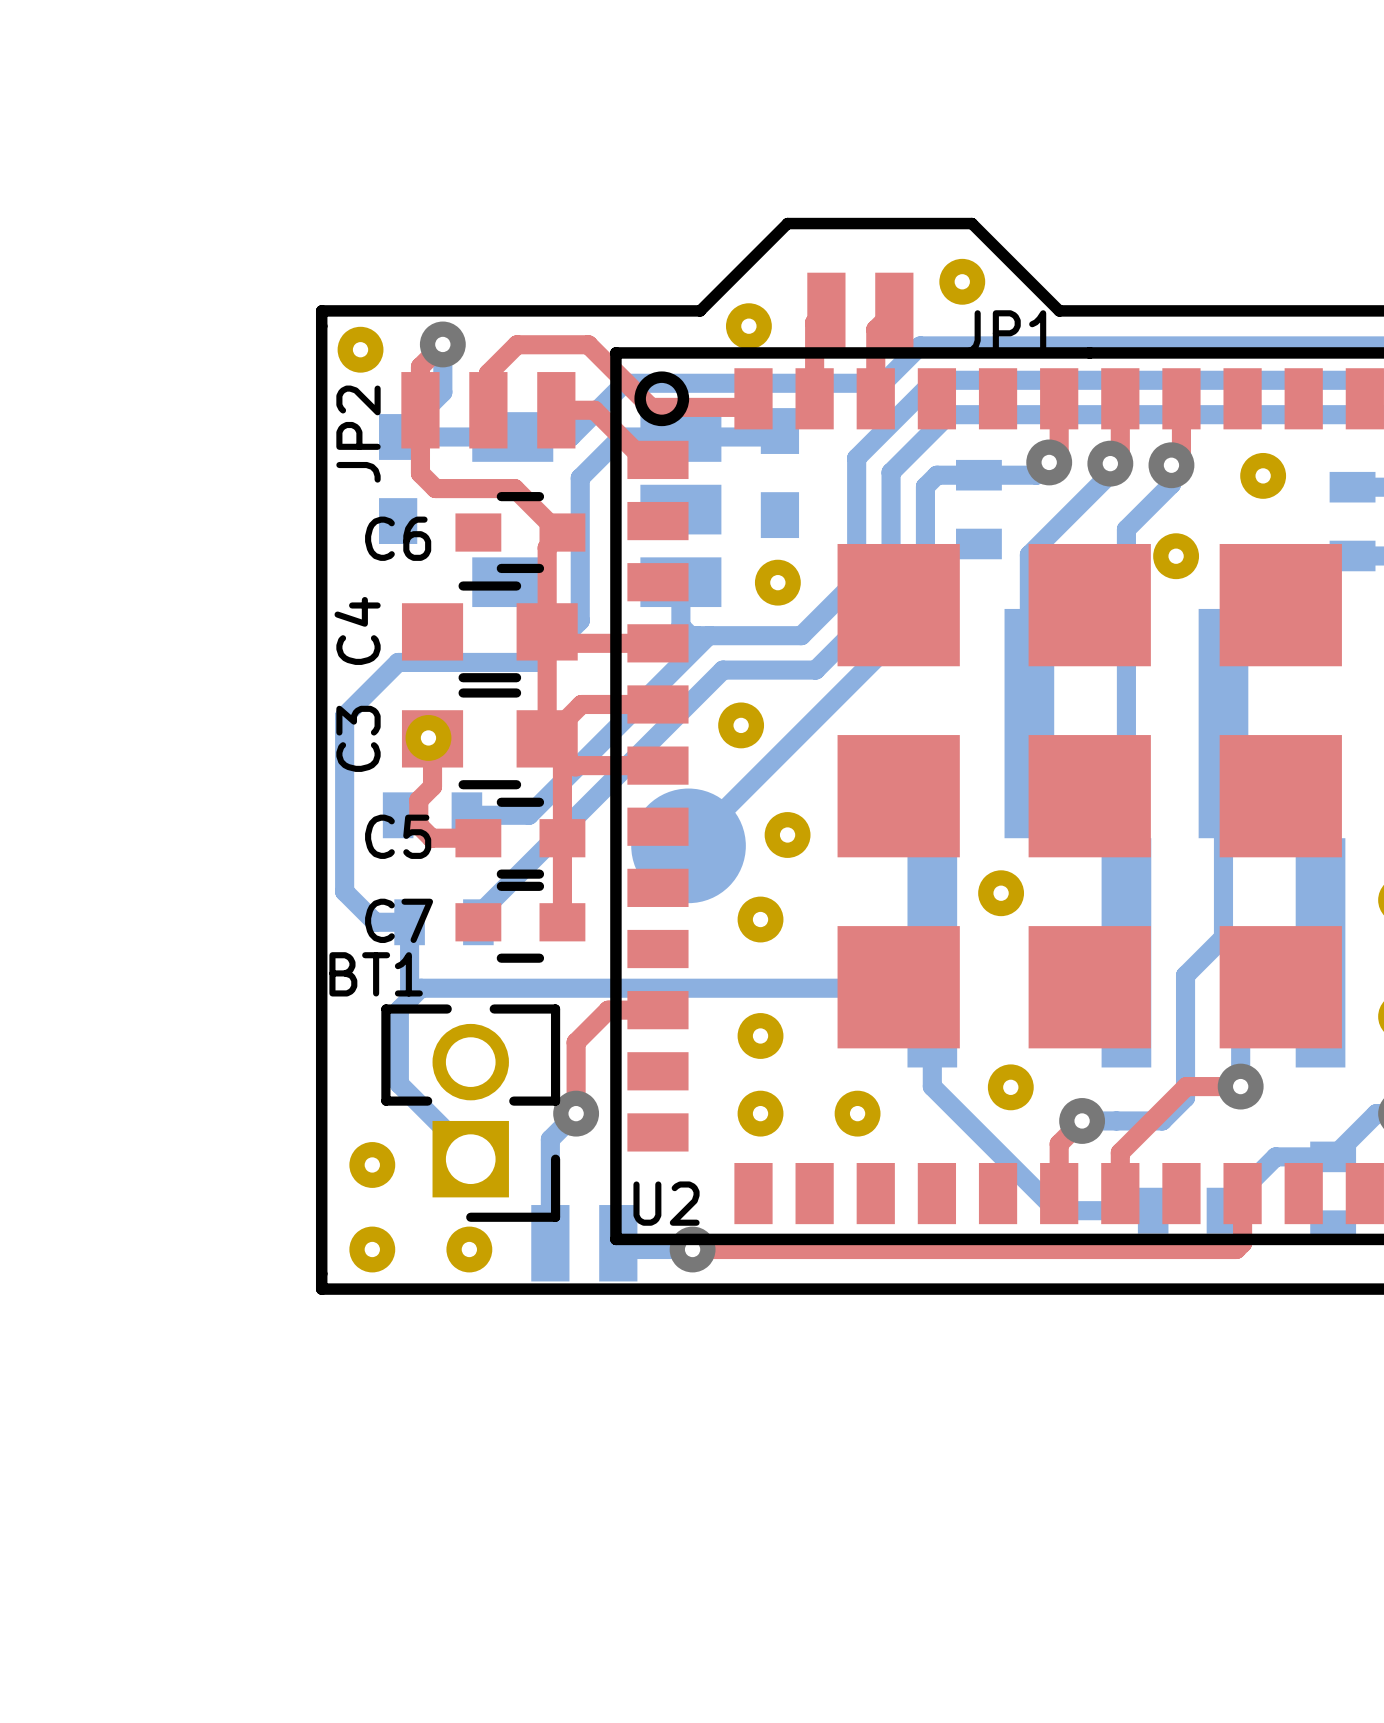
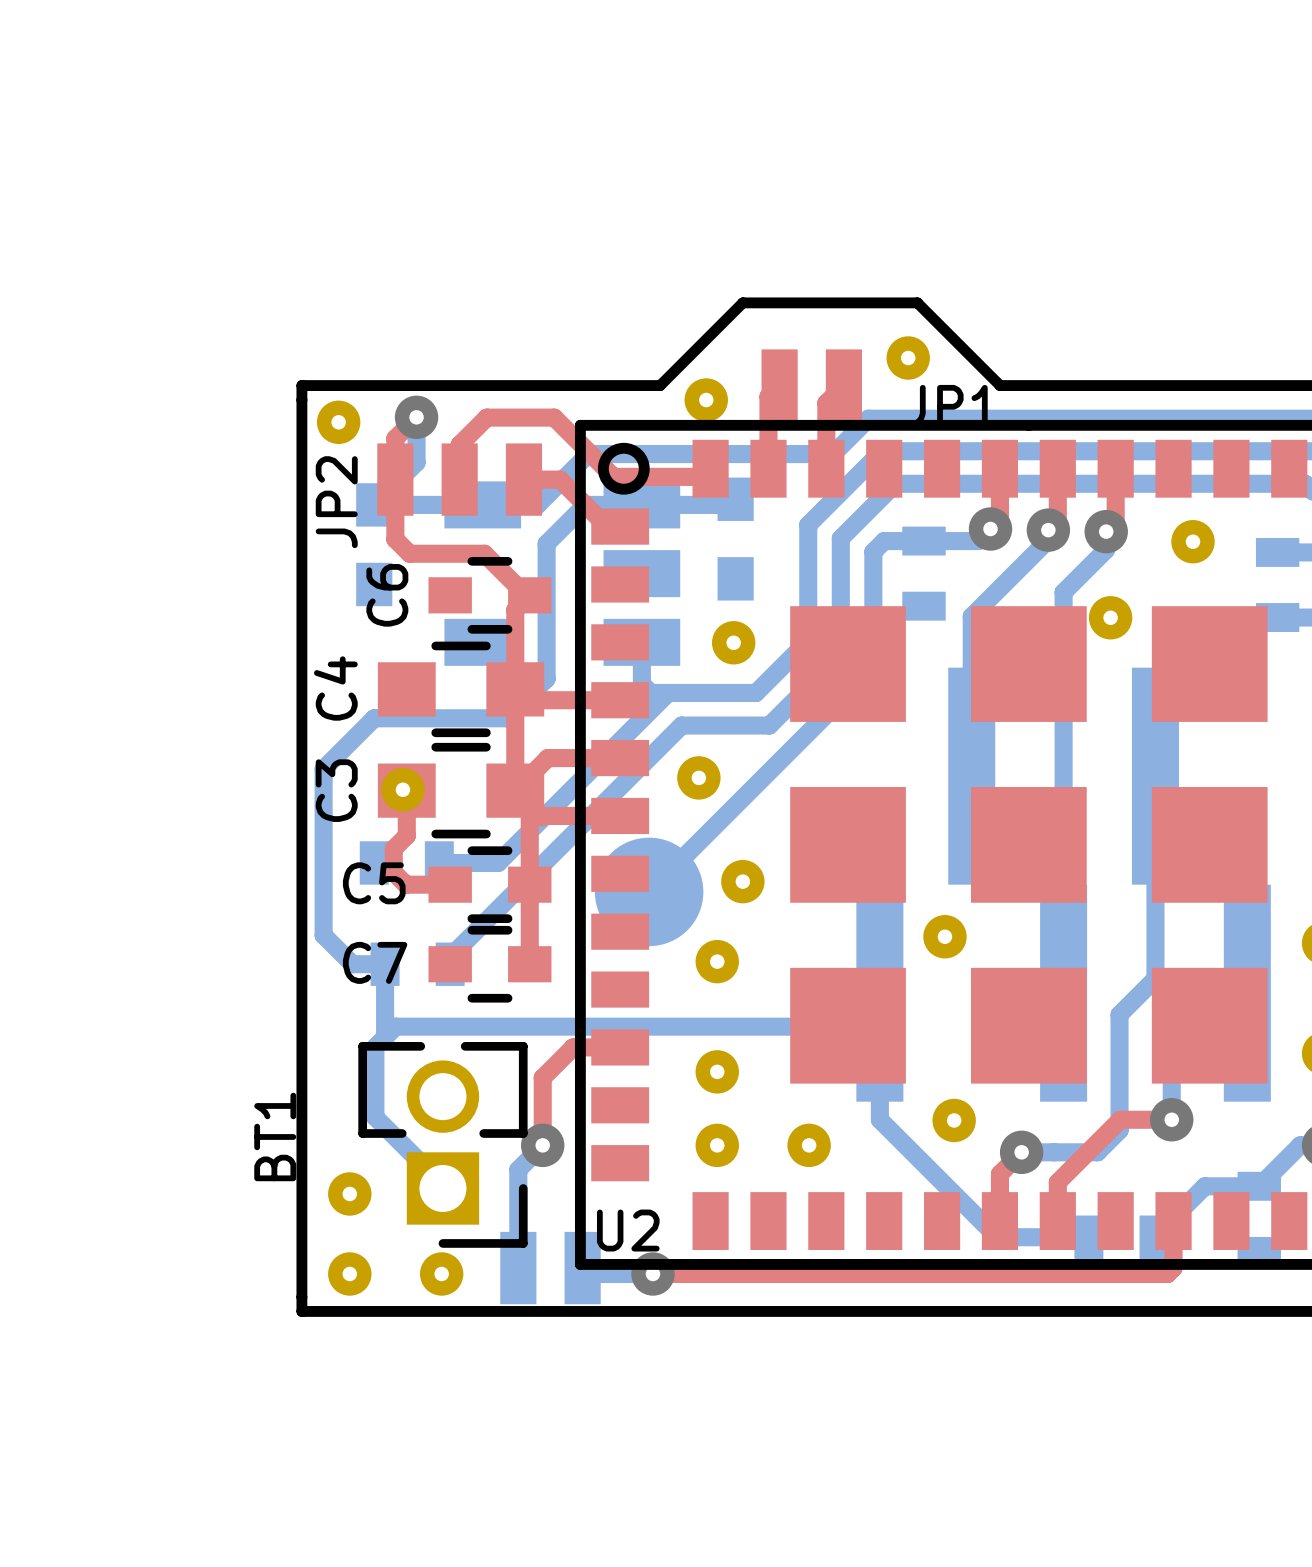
C6 name rotation: 0° (398, 538) -> 90° counterclockwise (387, 595)
BT1 name rotation: 0° (376, 974) -> 90° counterclockwise (275, 1136)
BT1 name position: BT1 (376, 974) -> BT1 (275, 1136)

